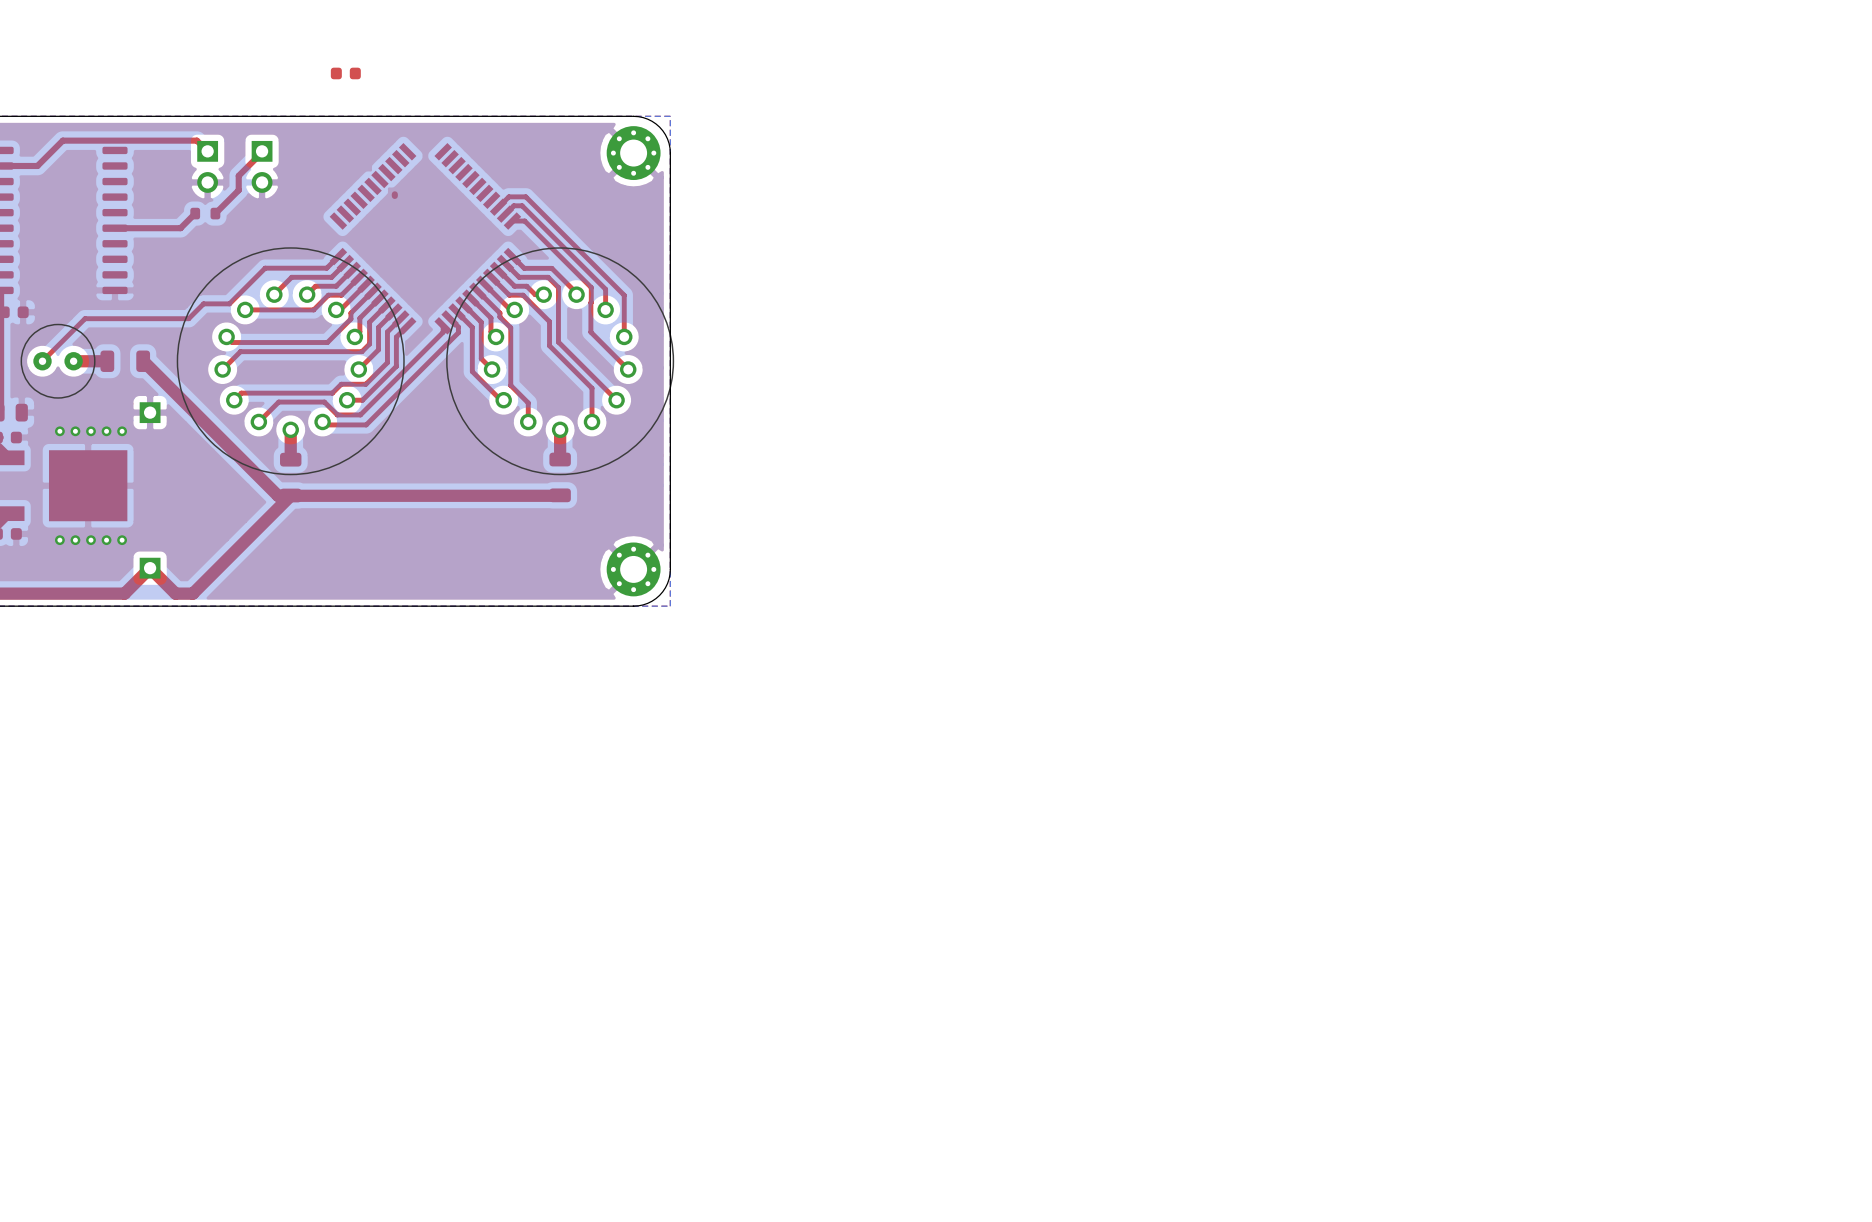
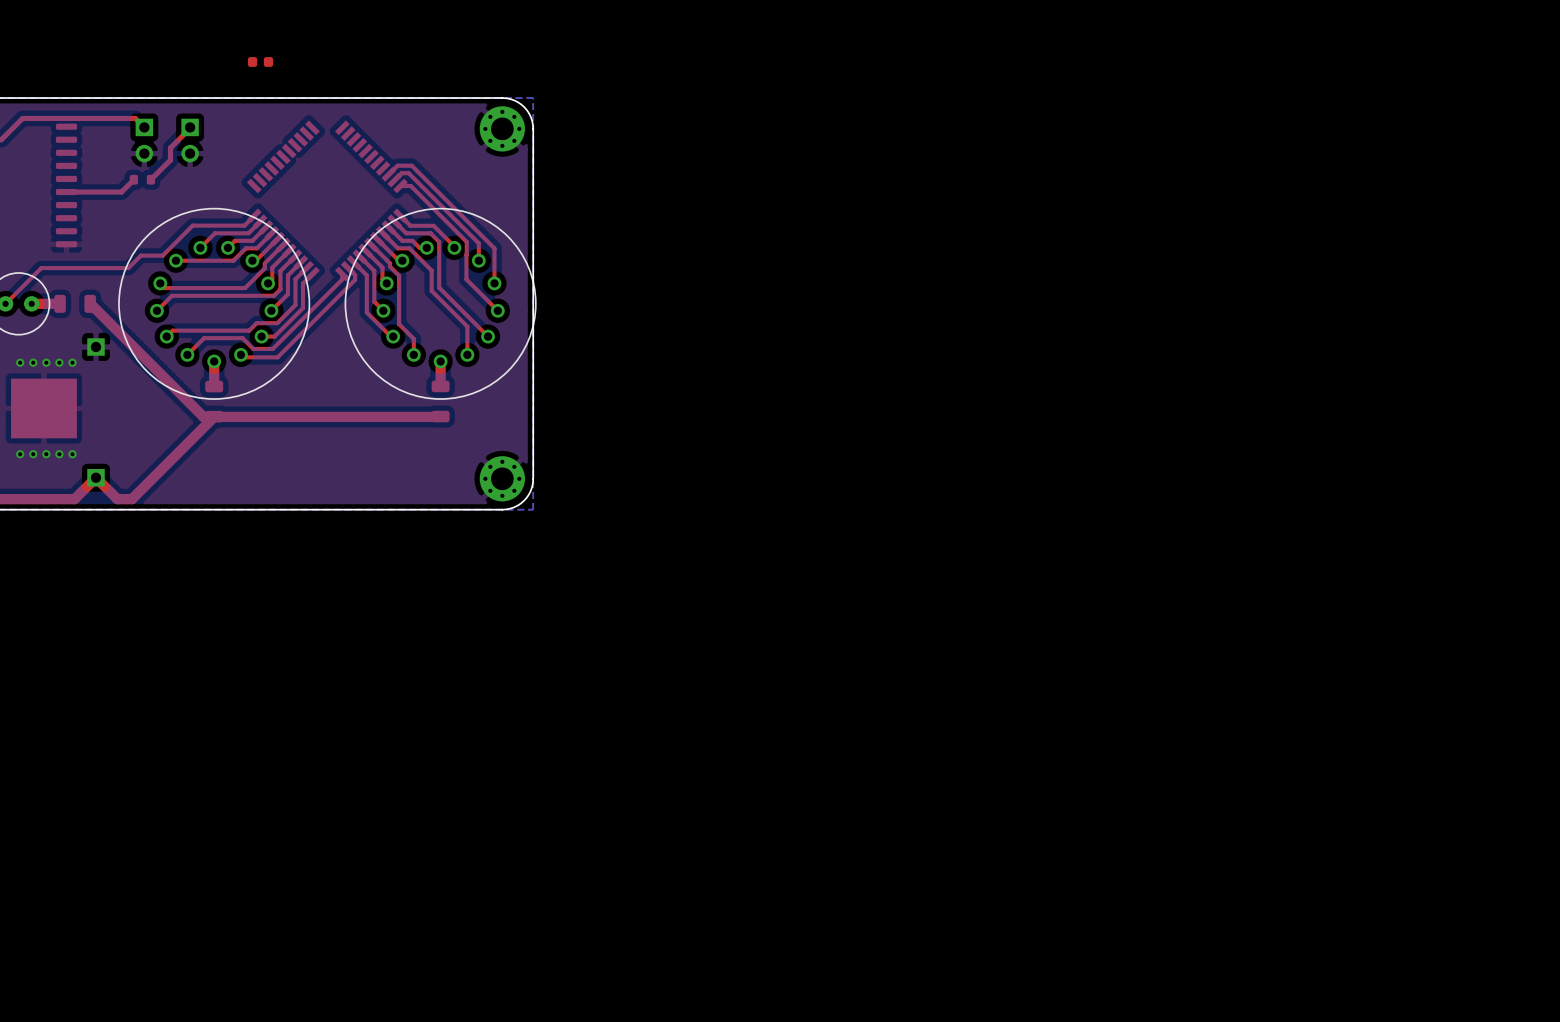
top track: (394, 194) (394, 195) -> none

